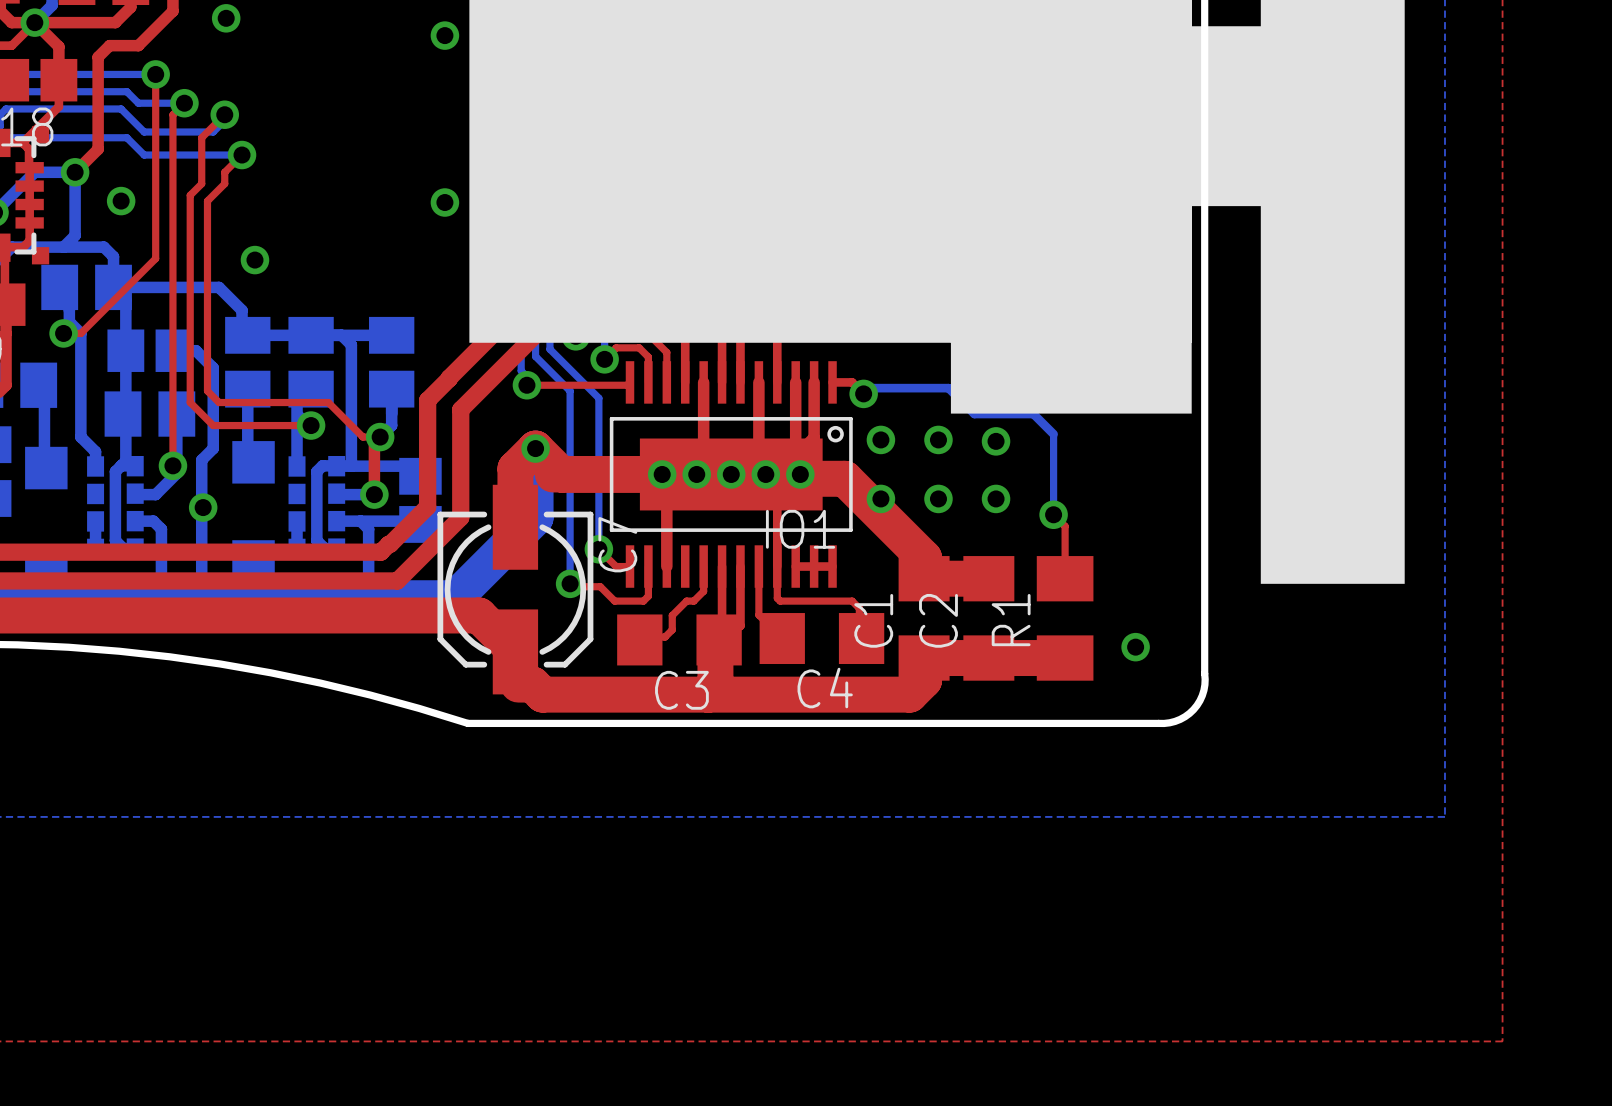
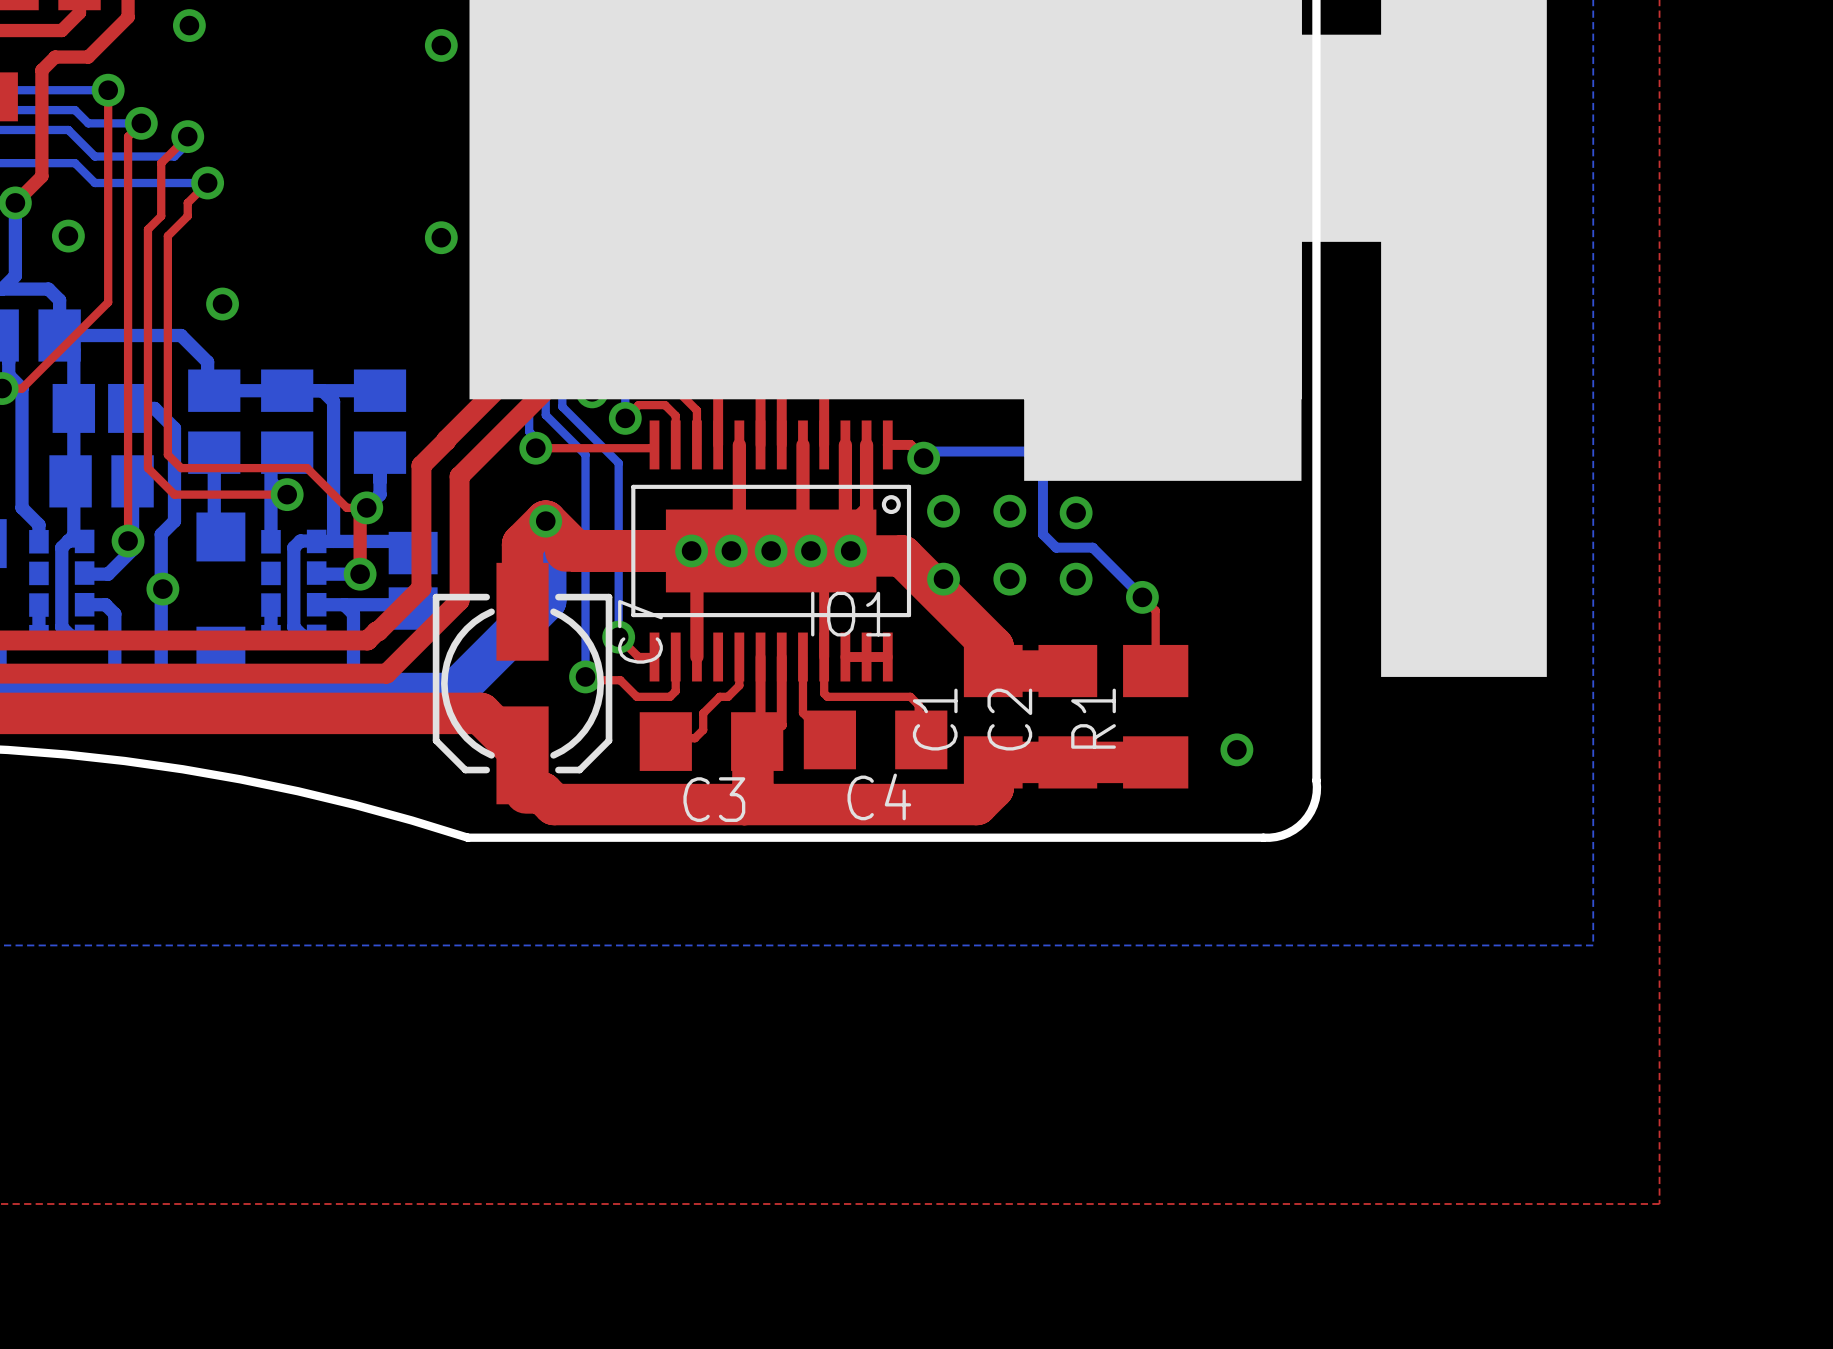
bottom track: (948, 388) (974, 414) (1033, 414) (1053, 434) (1053, 514) -> (1021, 451) (1026, 451) (1042, 468) (1042, 534) (1056, 547) (1092, 547) (1142, 597)

